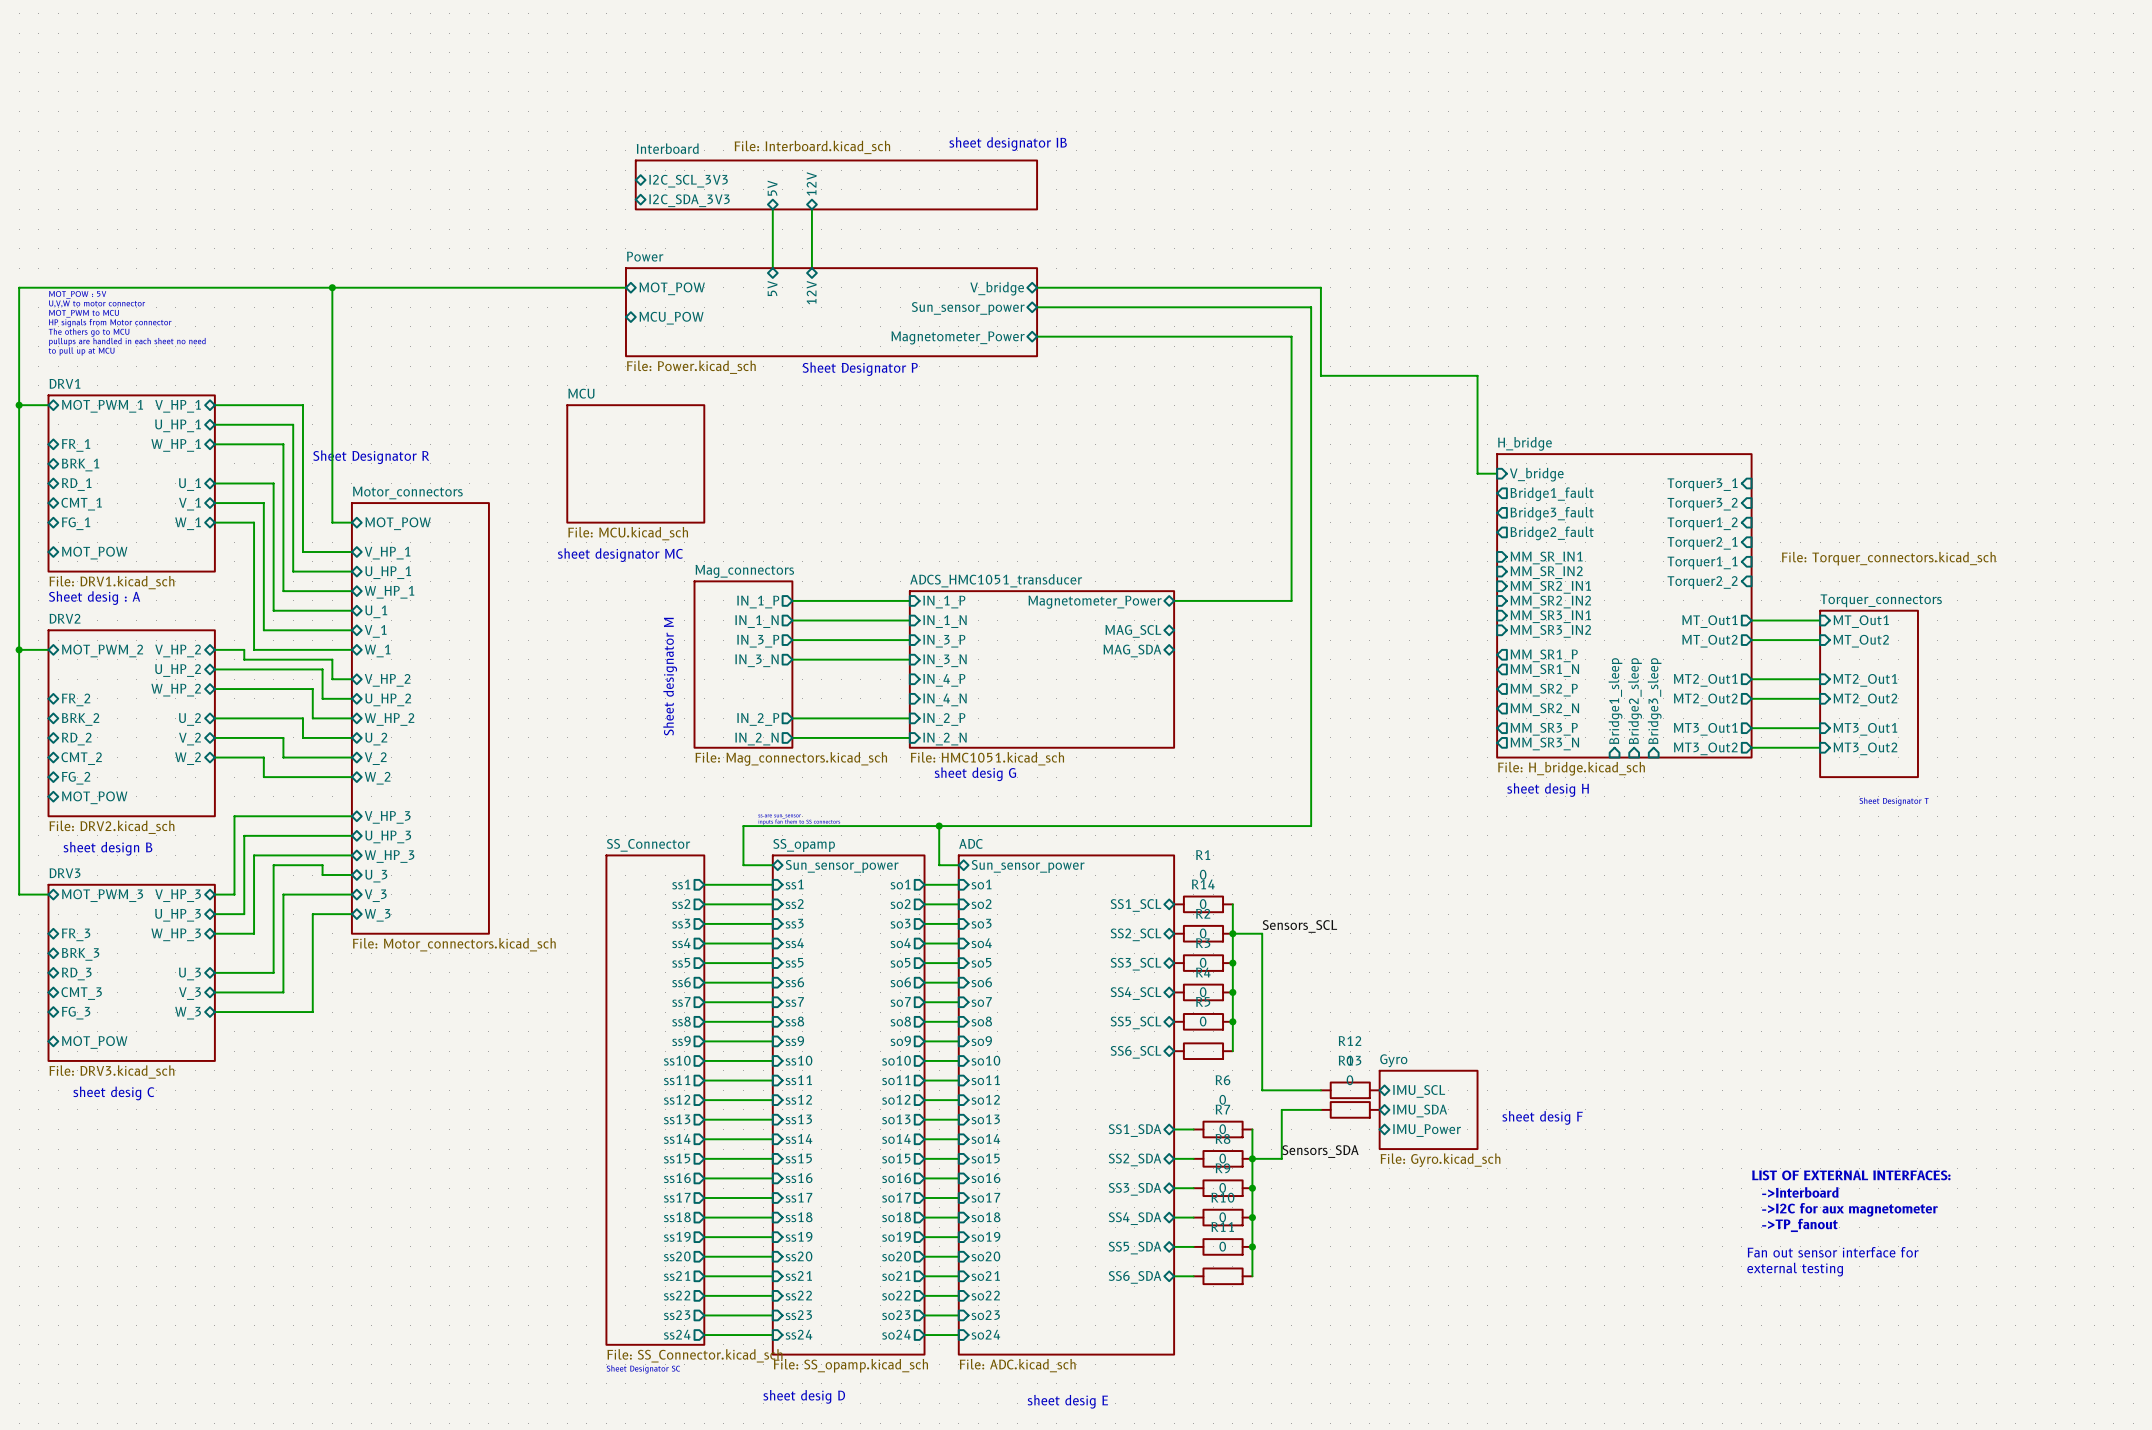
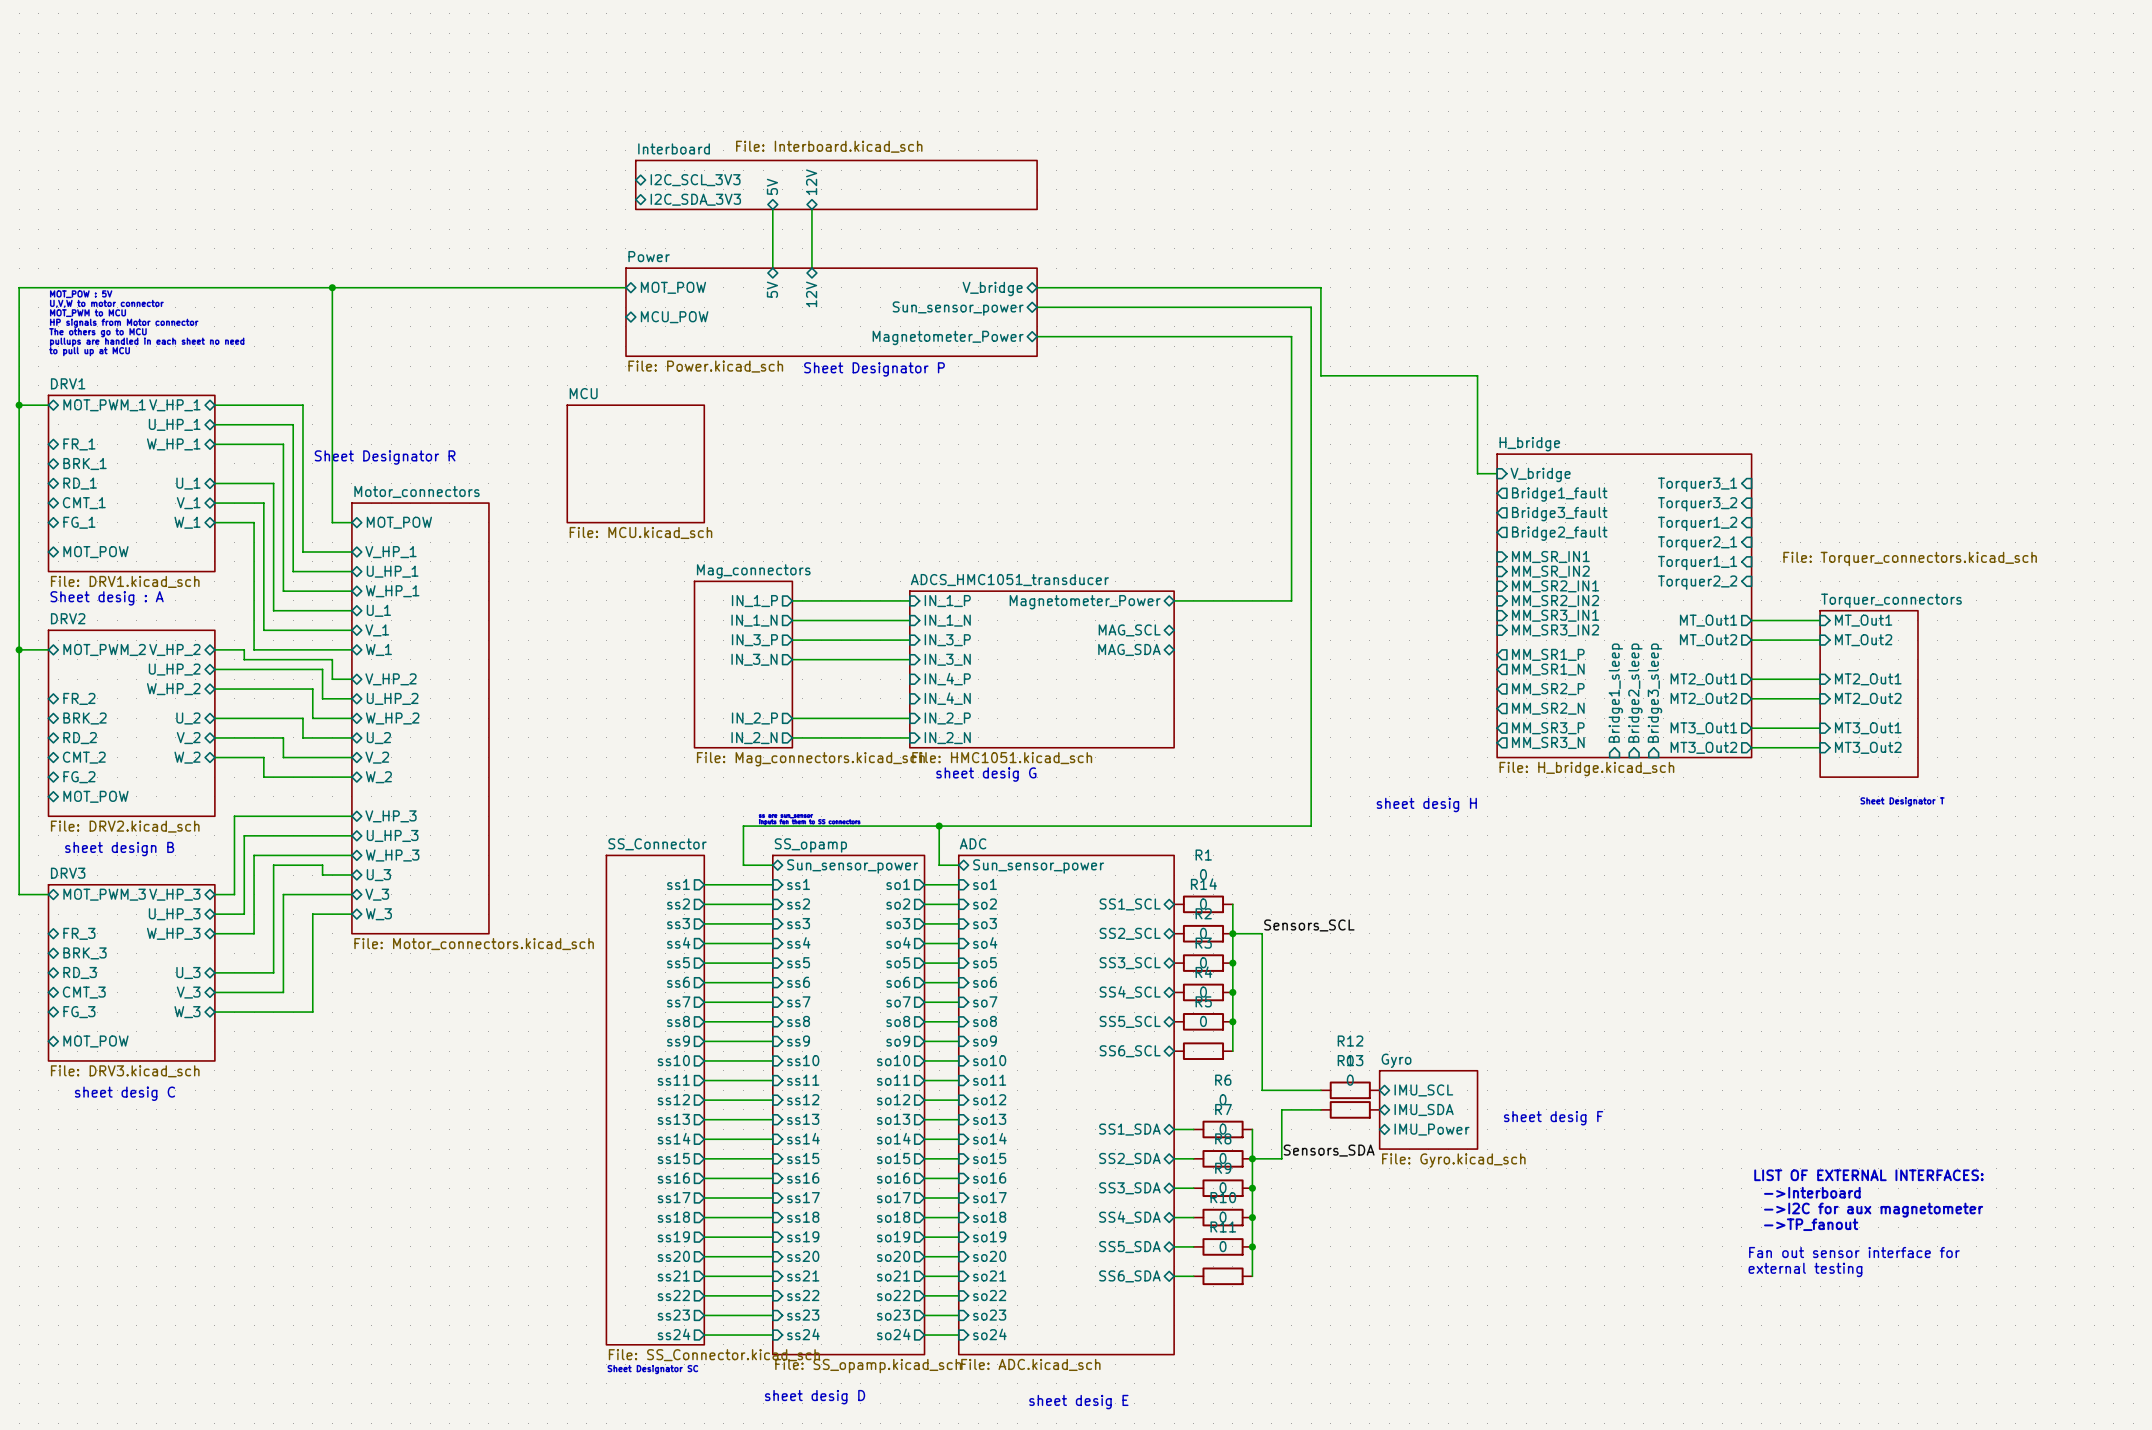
text: sheet designator IB (1008, 144) -> none
text: sheet designator MC (620, 555) -> none
text: Sheet designator M (670, 676) -> none
text position: sheet desig H (1548, 790) -> sheet desig H (1426, 804)

